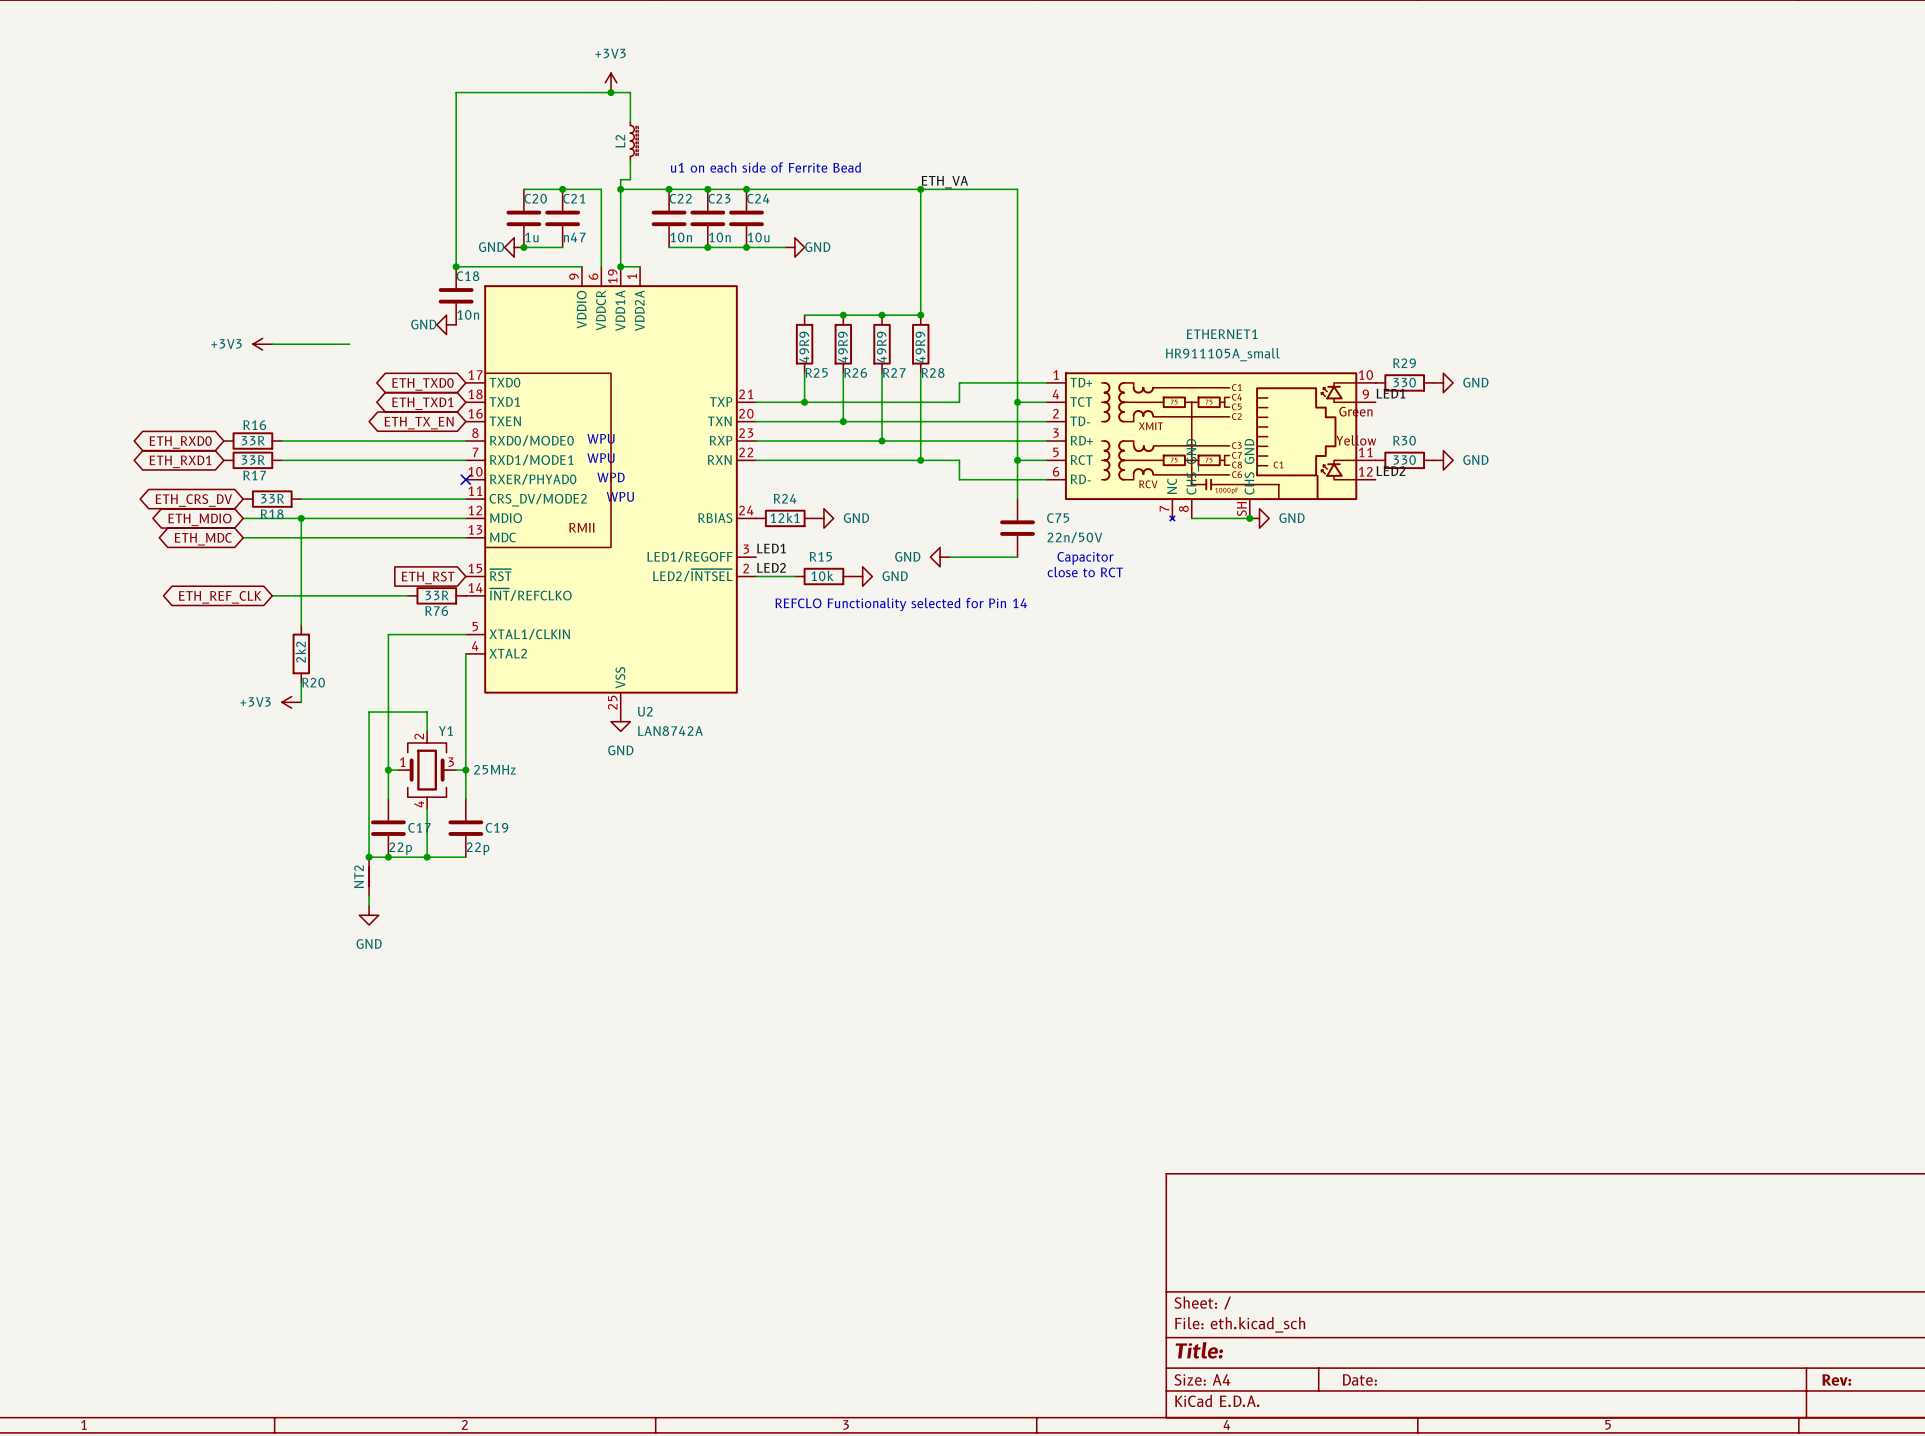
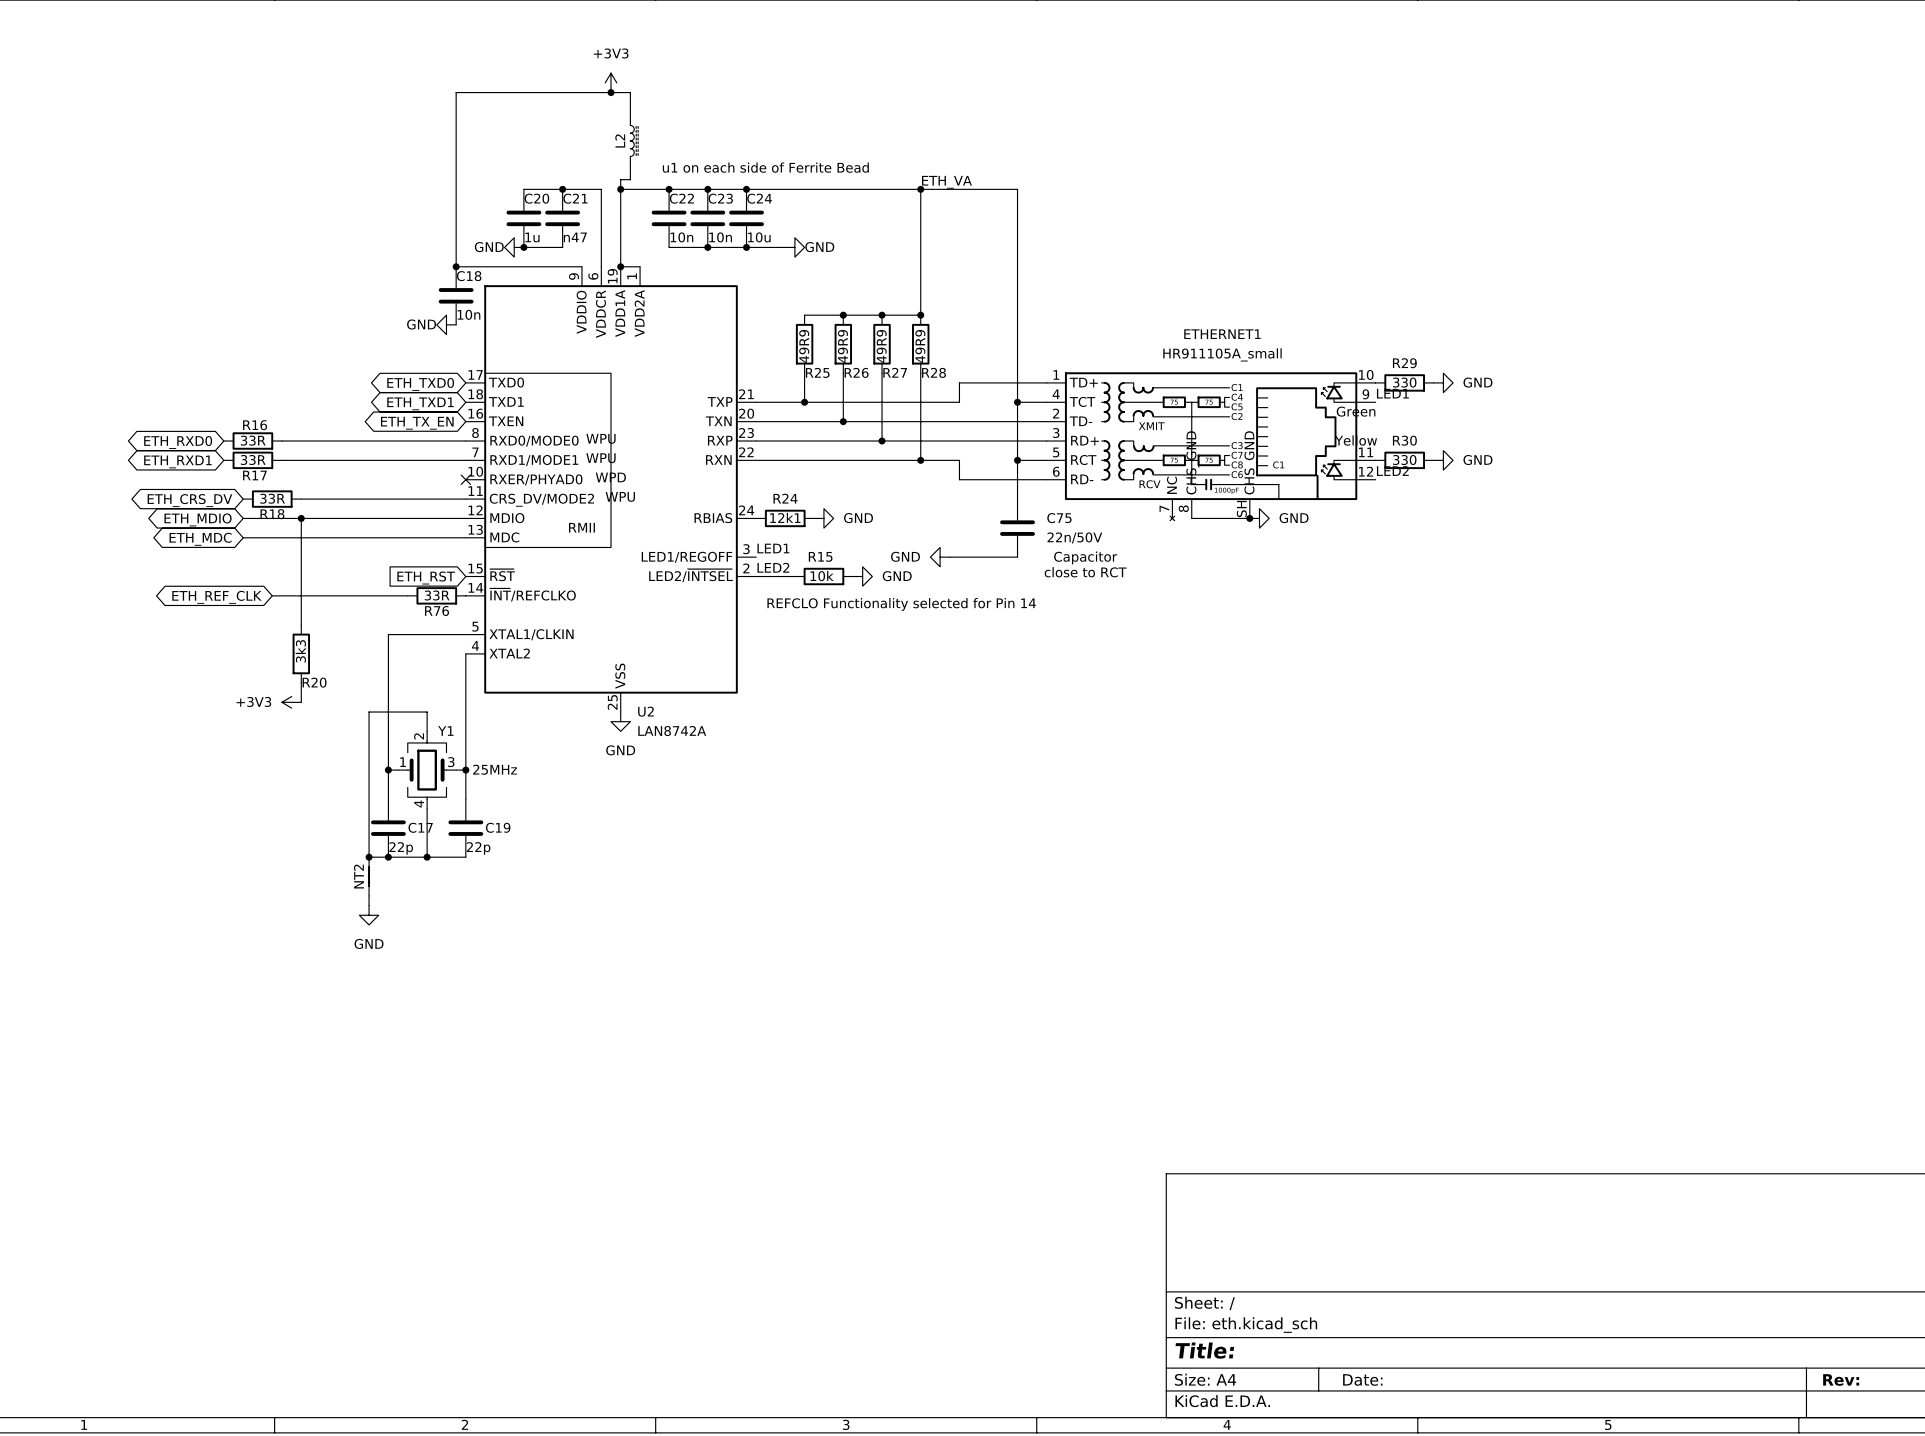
power symbol: +3V3 (262, 344) -> none
wire: (272, 344) (349, 344) -> none
R20 value: 2k2 (300, 652) -> 3k3 (300, 651)

